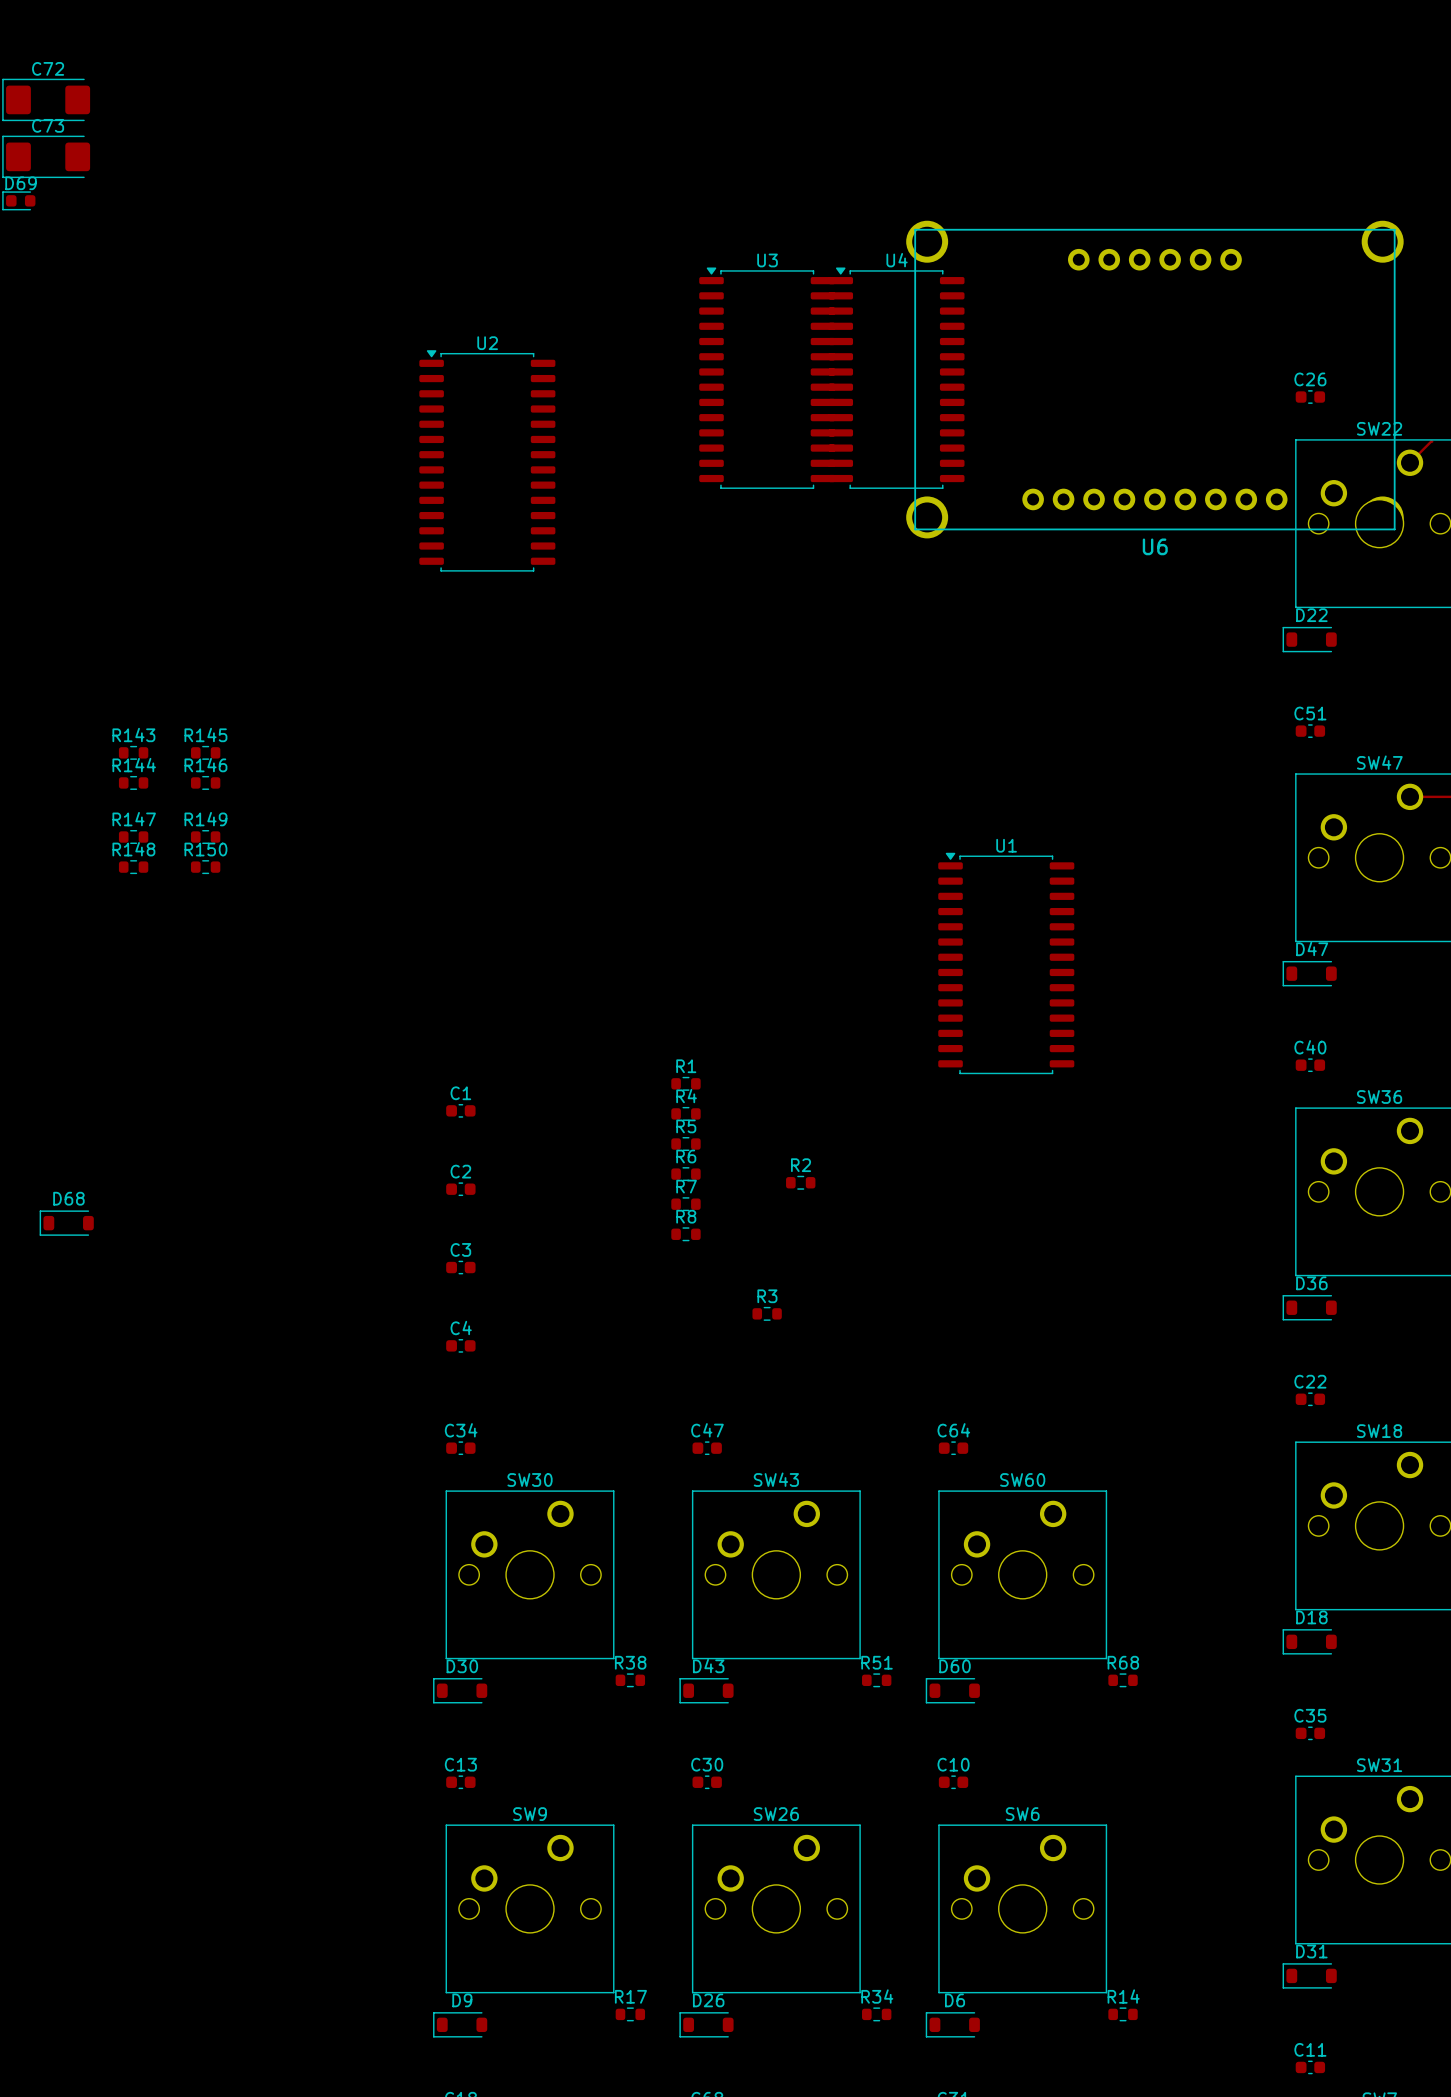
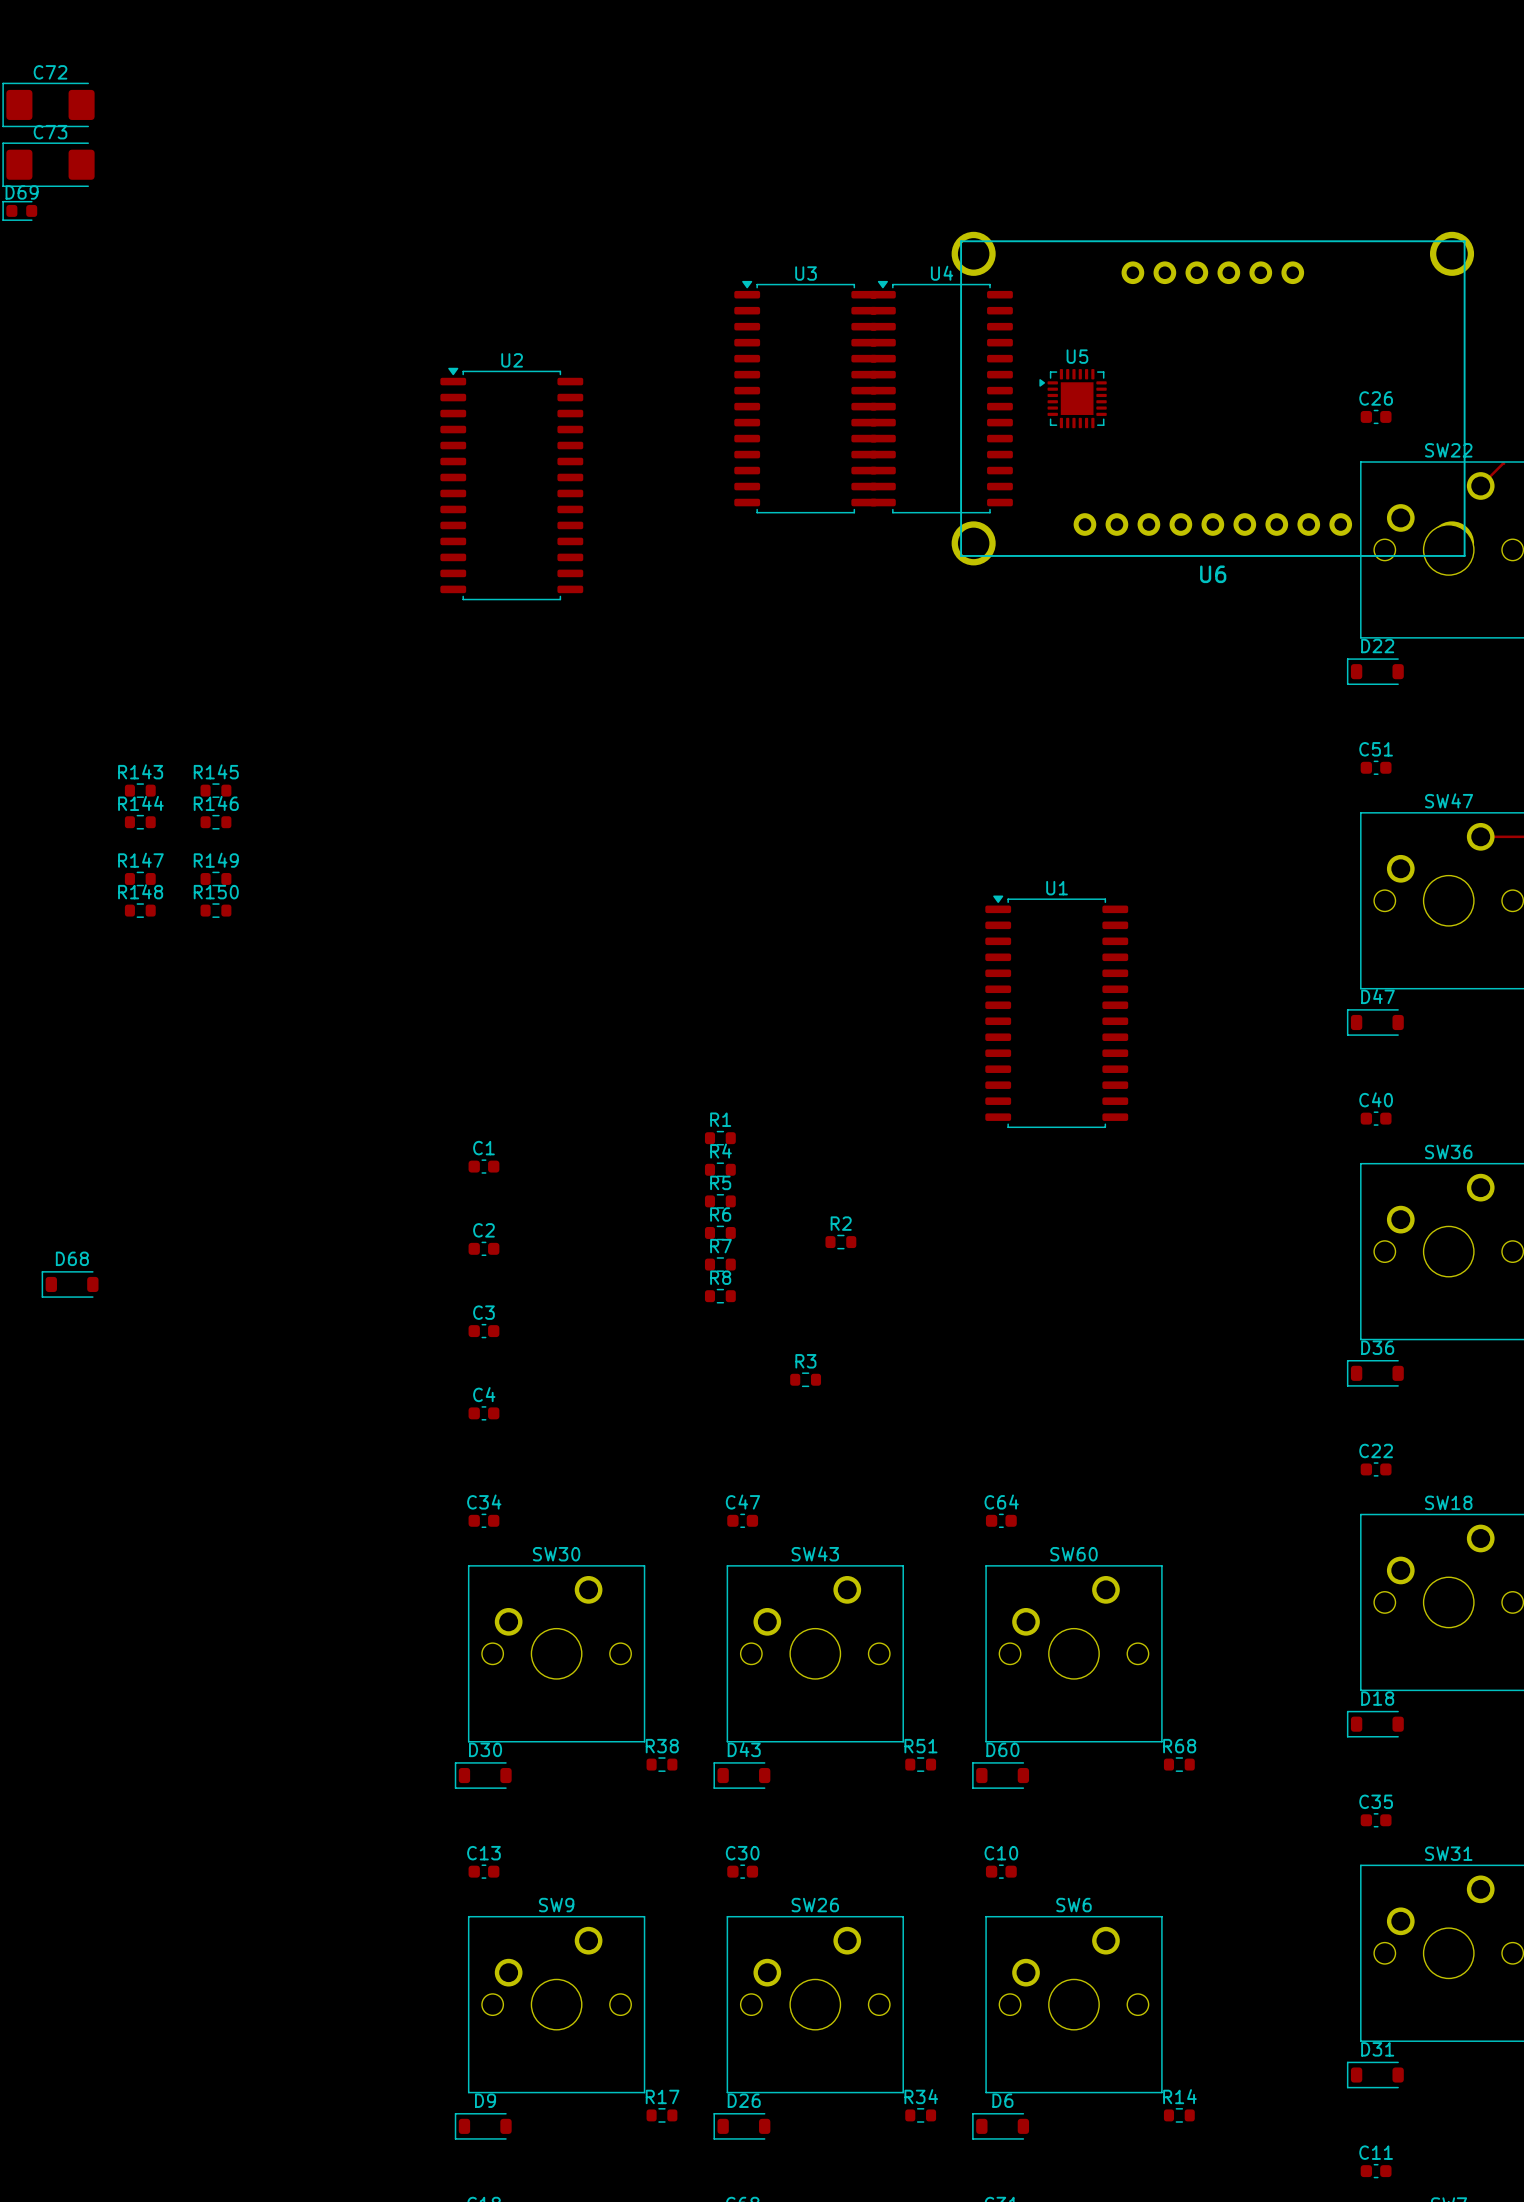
U5: none -> (1073, 398)

